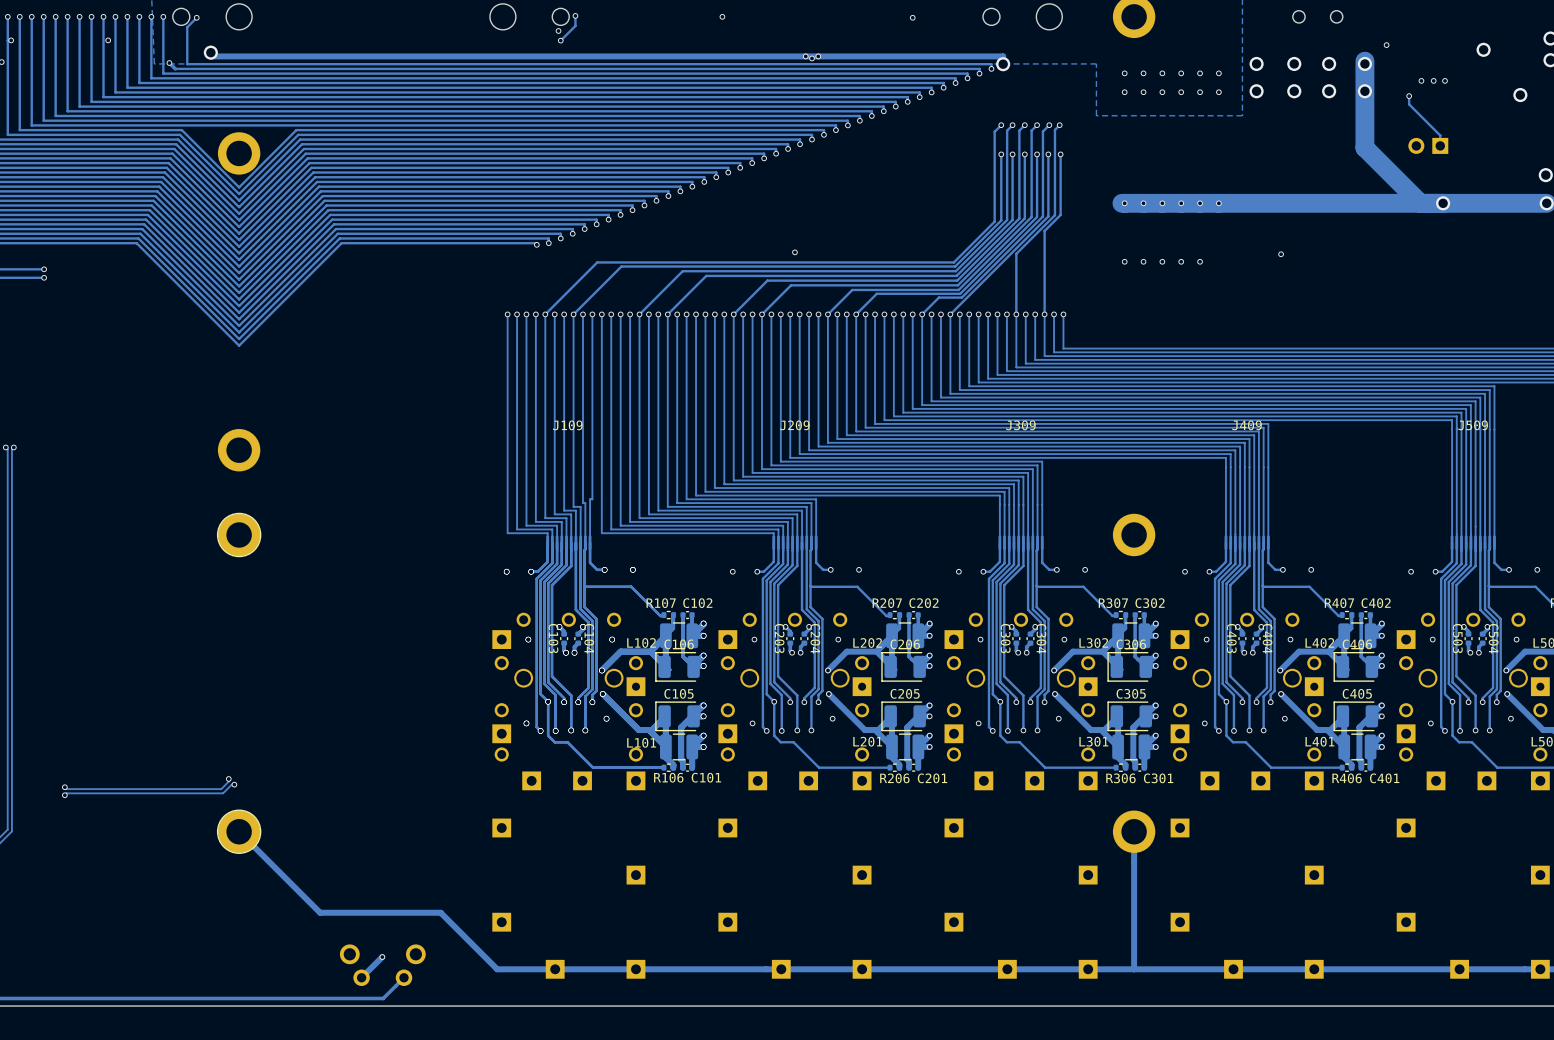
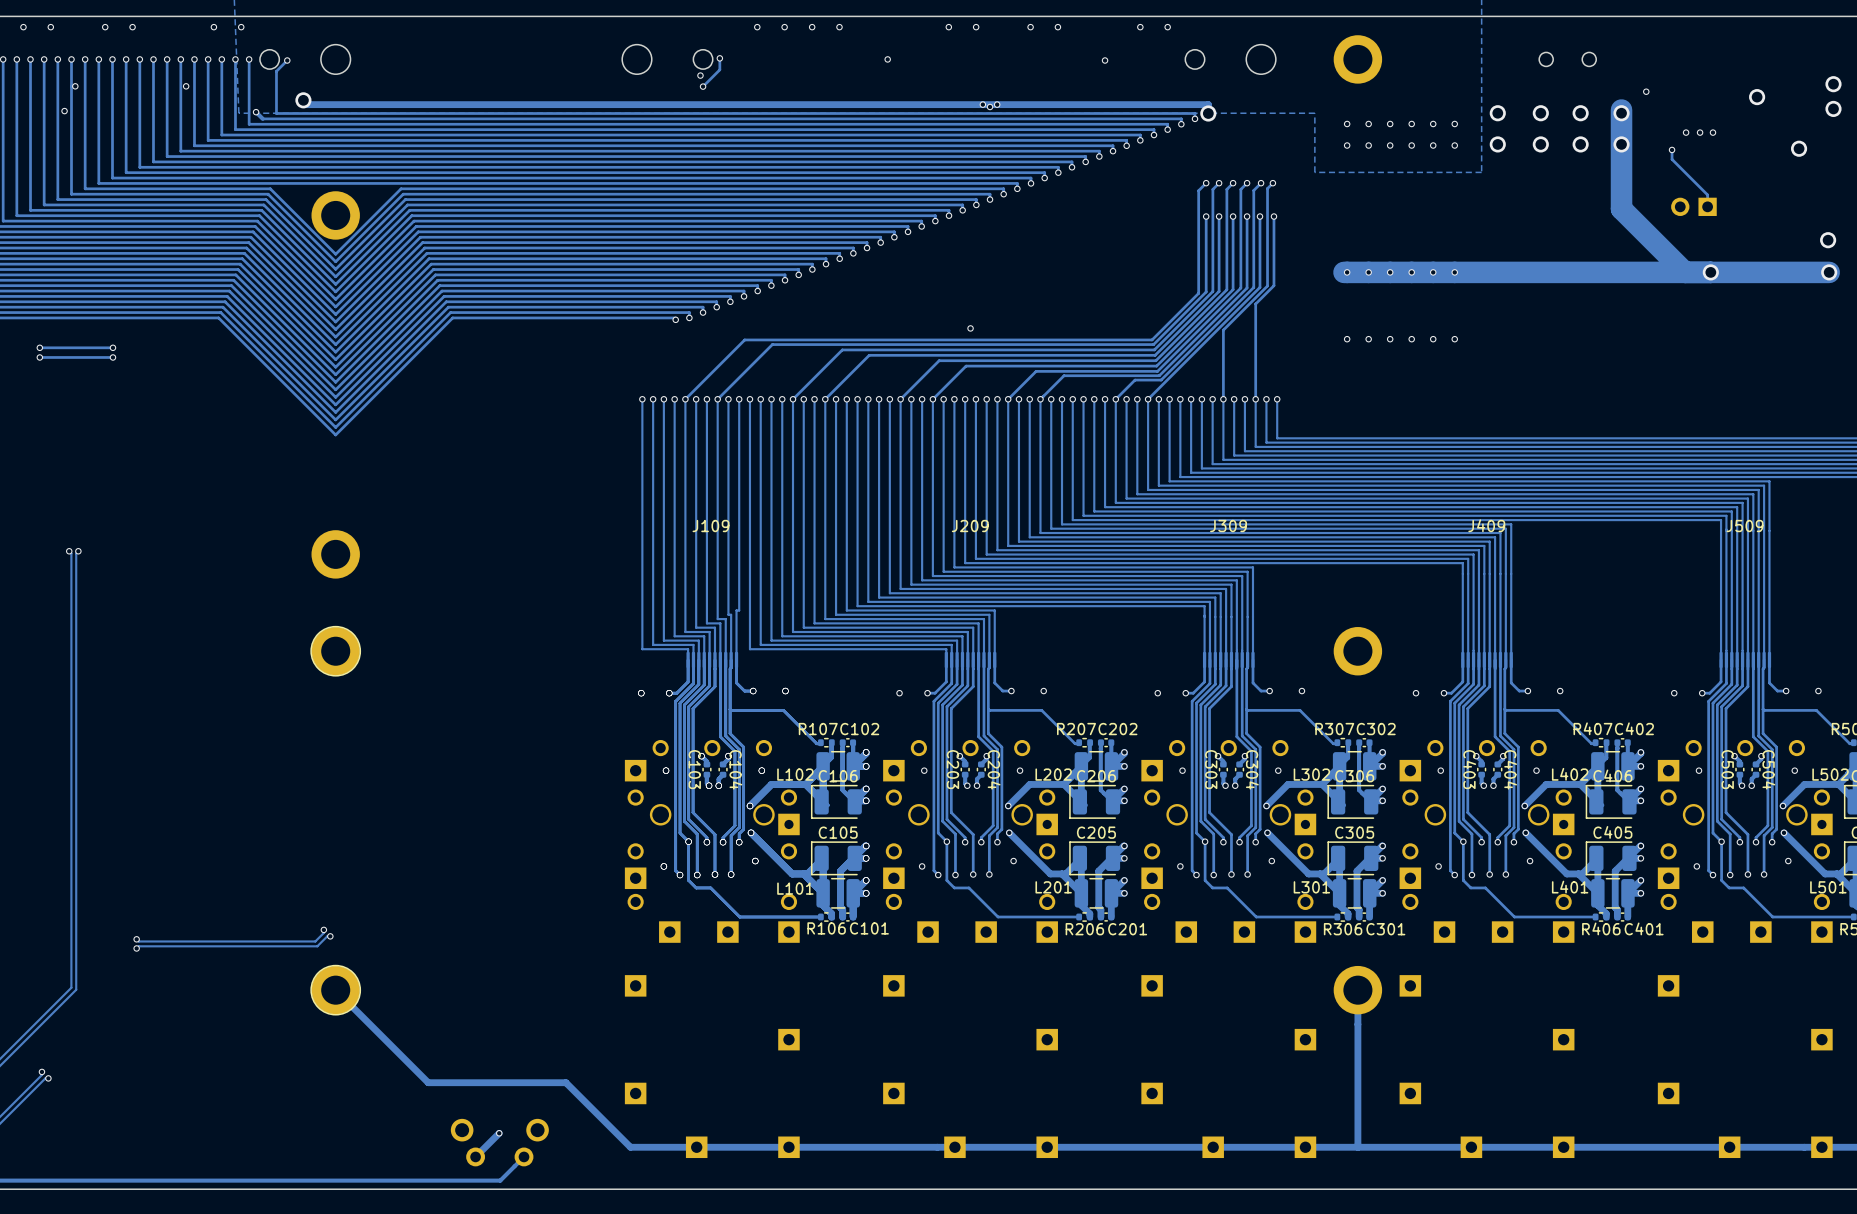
via: (1281, 254) -> none
via: none -> (1454, 339)

